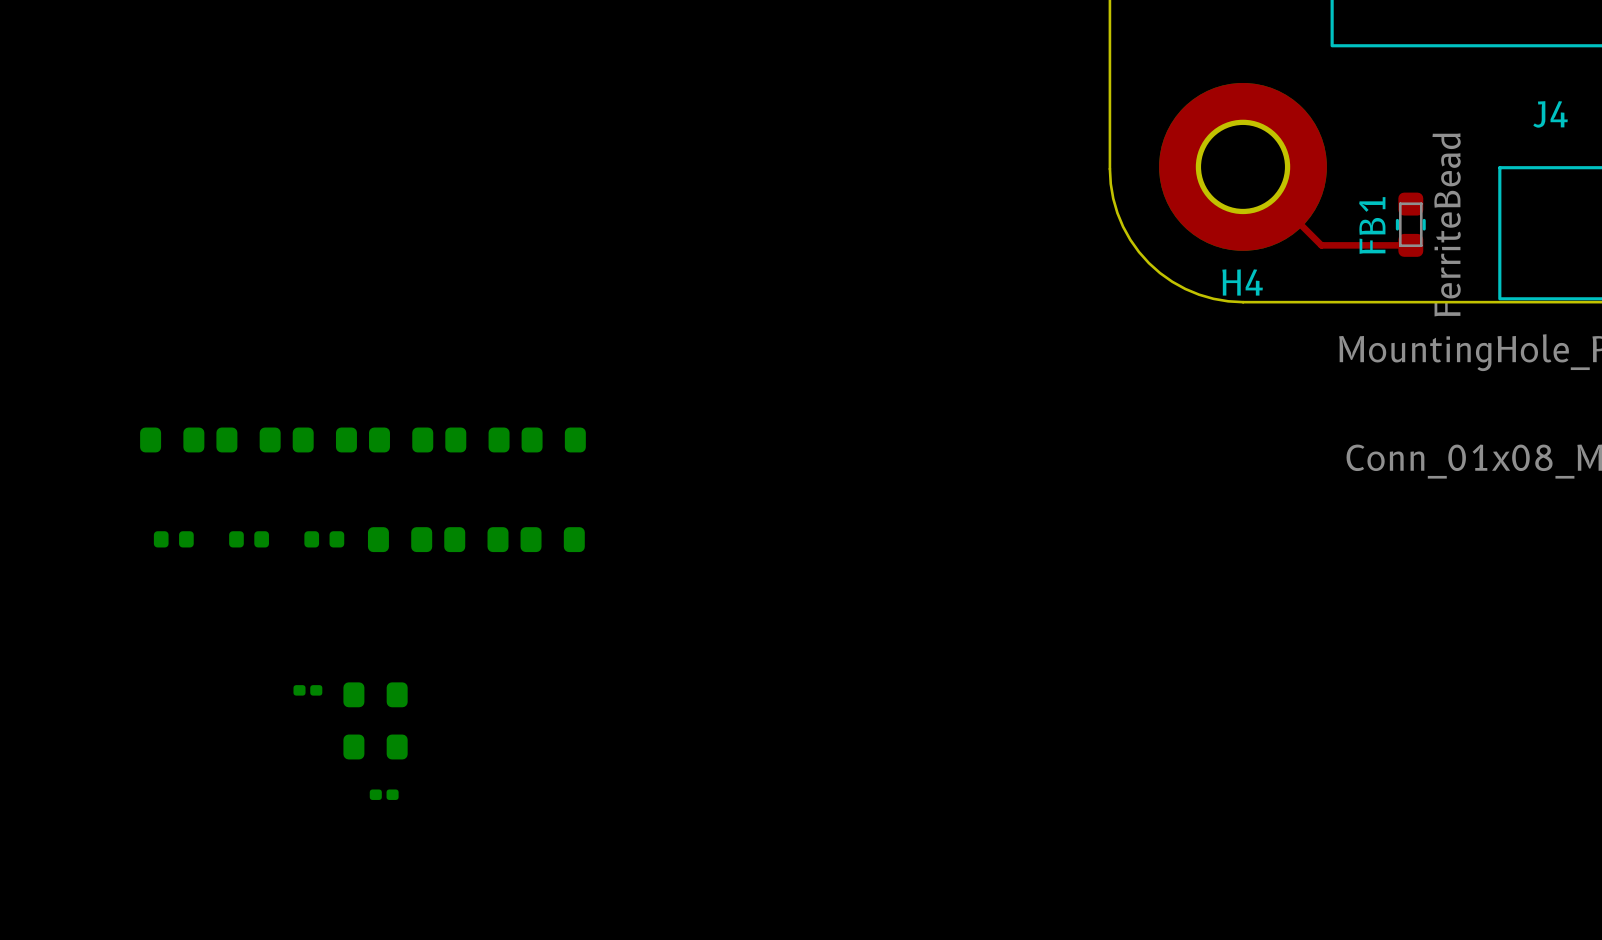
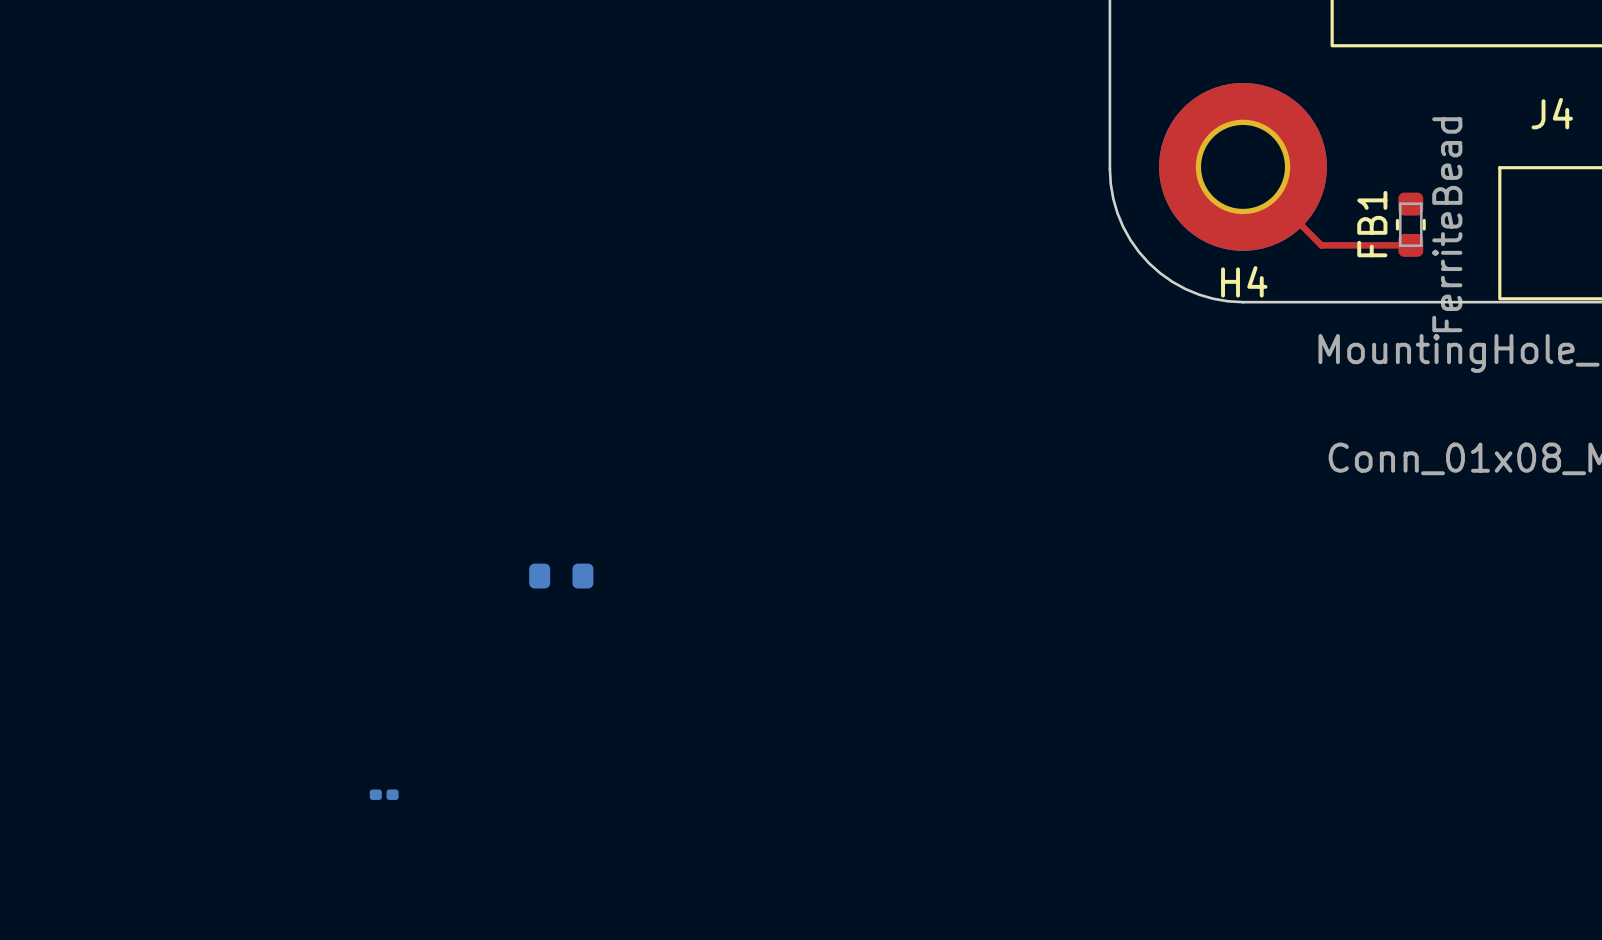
part: (172, 439) -> none
part: (248, 439) -> none
part: (324, 439) -> none
part: (401, 439) -> none
part: (477, 439) -> none
part: (553, 439) -> none
part: (173, 539) -> none
part: (249, 539) -> none
part: (324, 539) -> none
part: (400, 539) -> none
part: (476, 539) -> none
part position: (552, 539) -> (561, 576)
part: (307, 690) -> none
part: (375, 694) -> none
part: (375, 747) -> none

